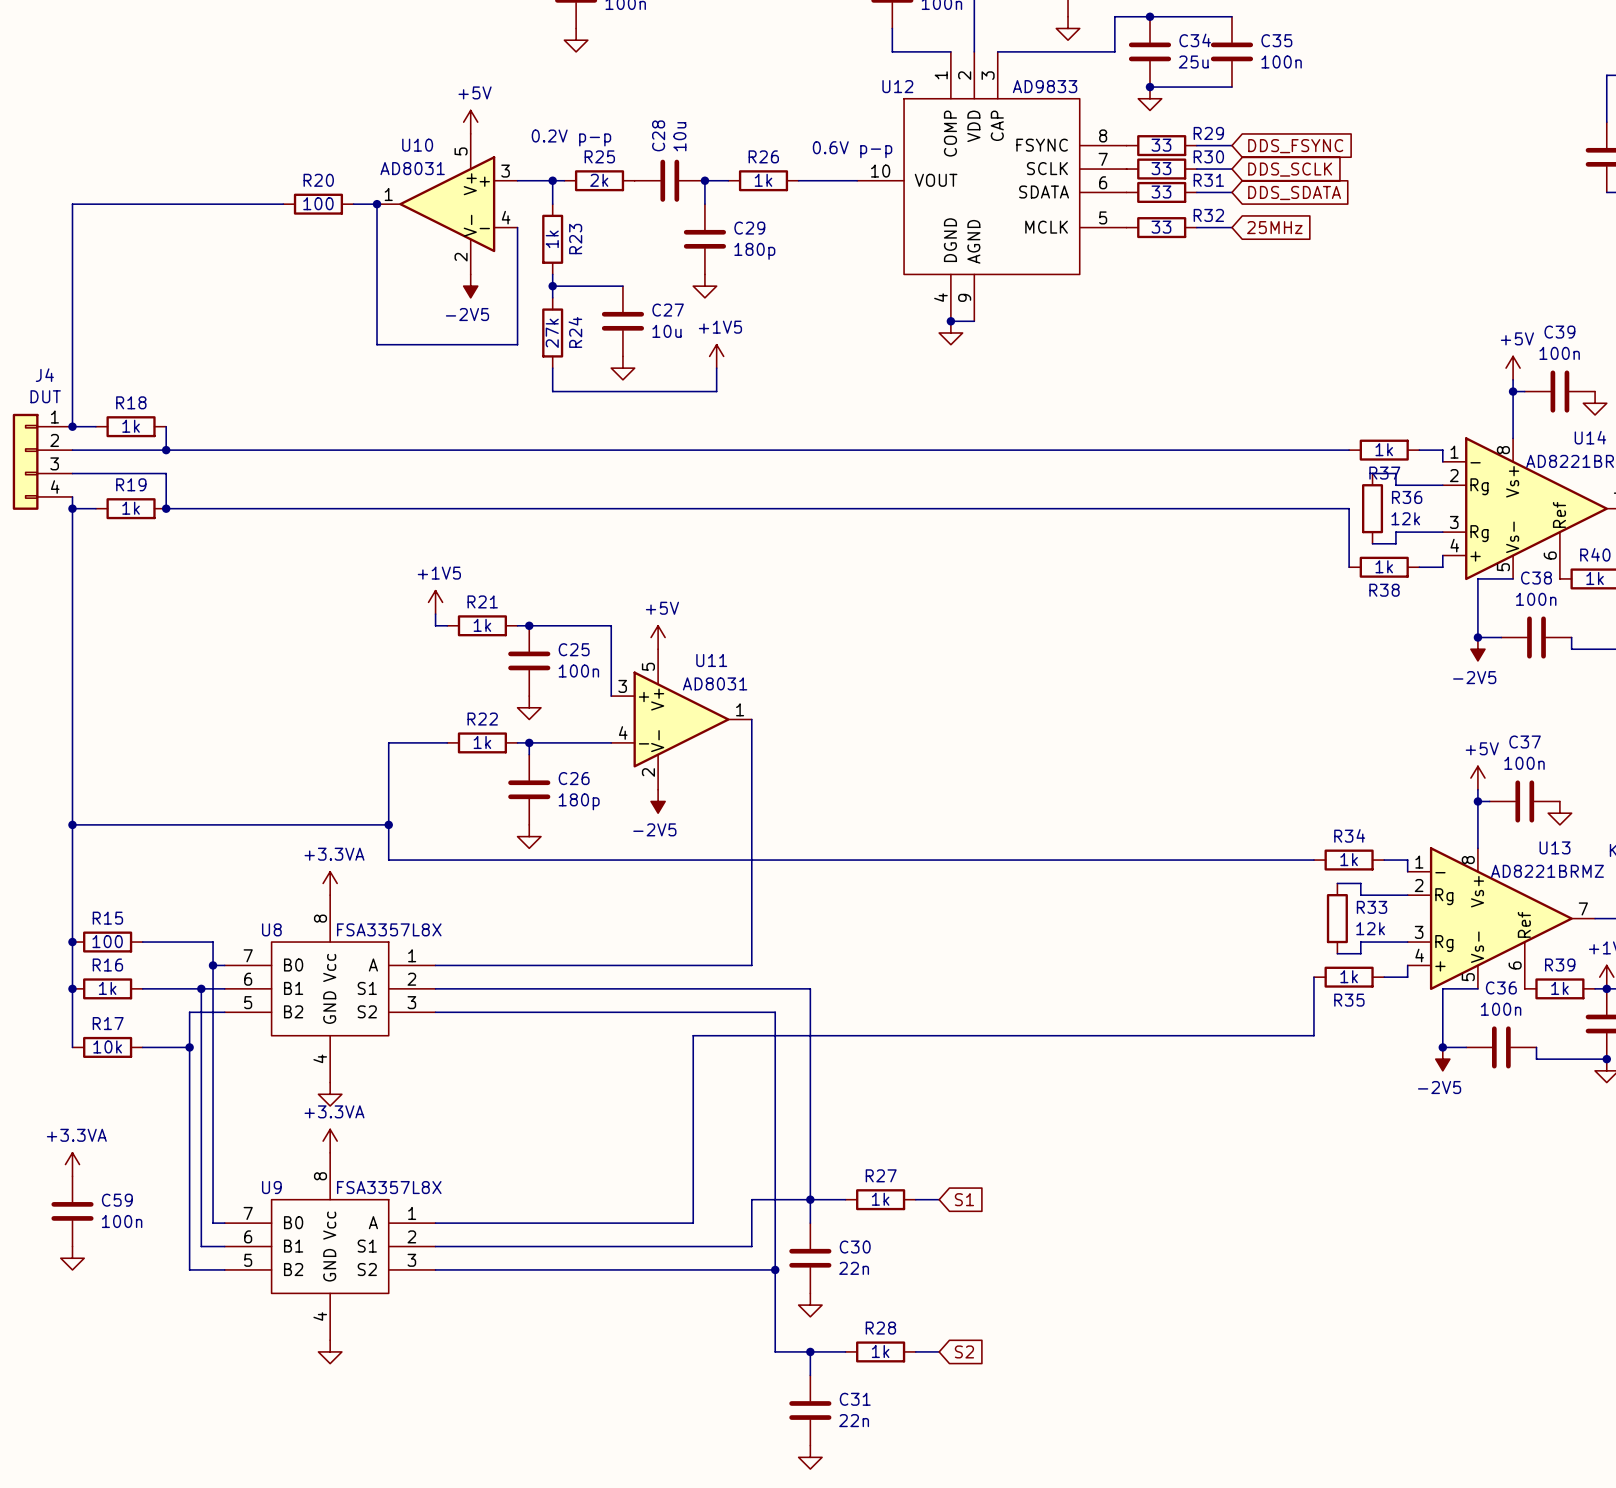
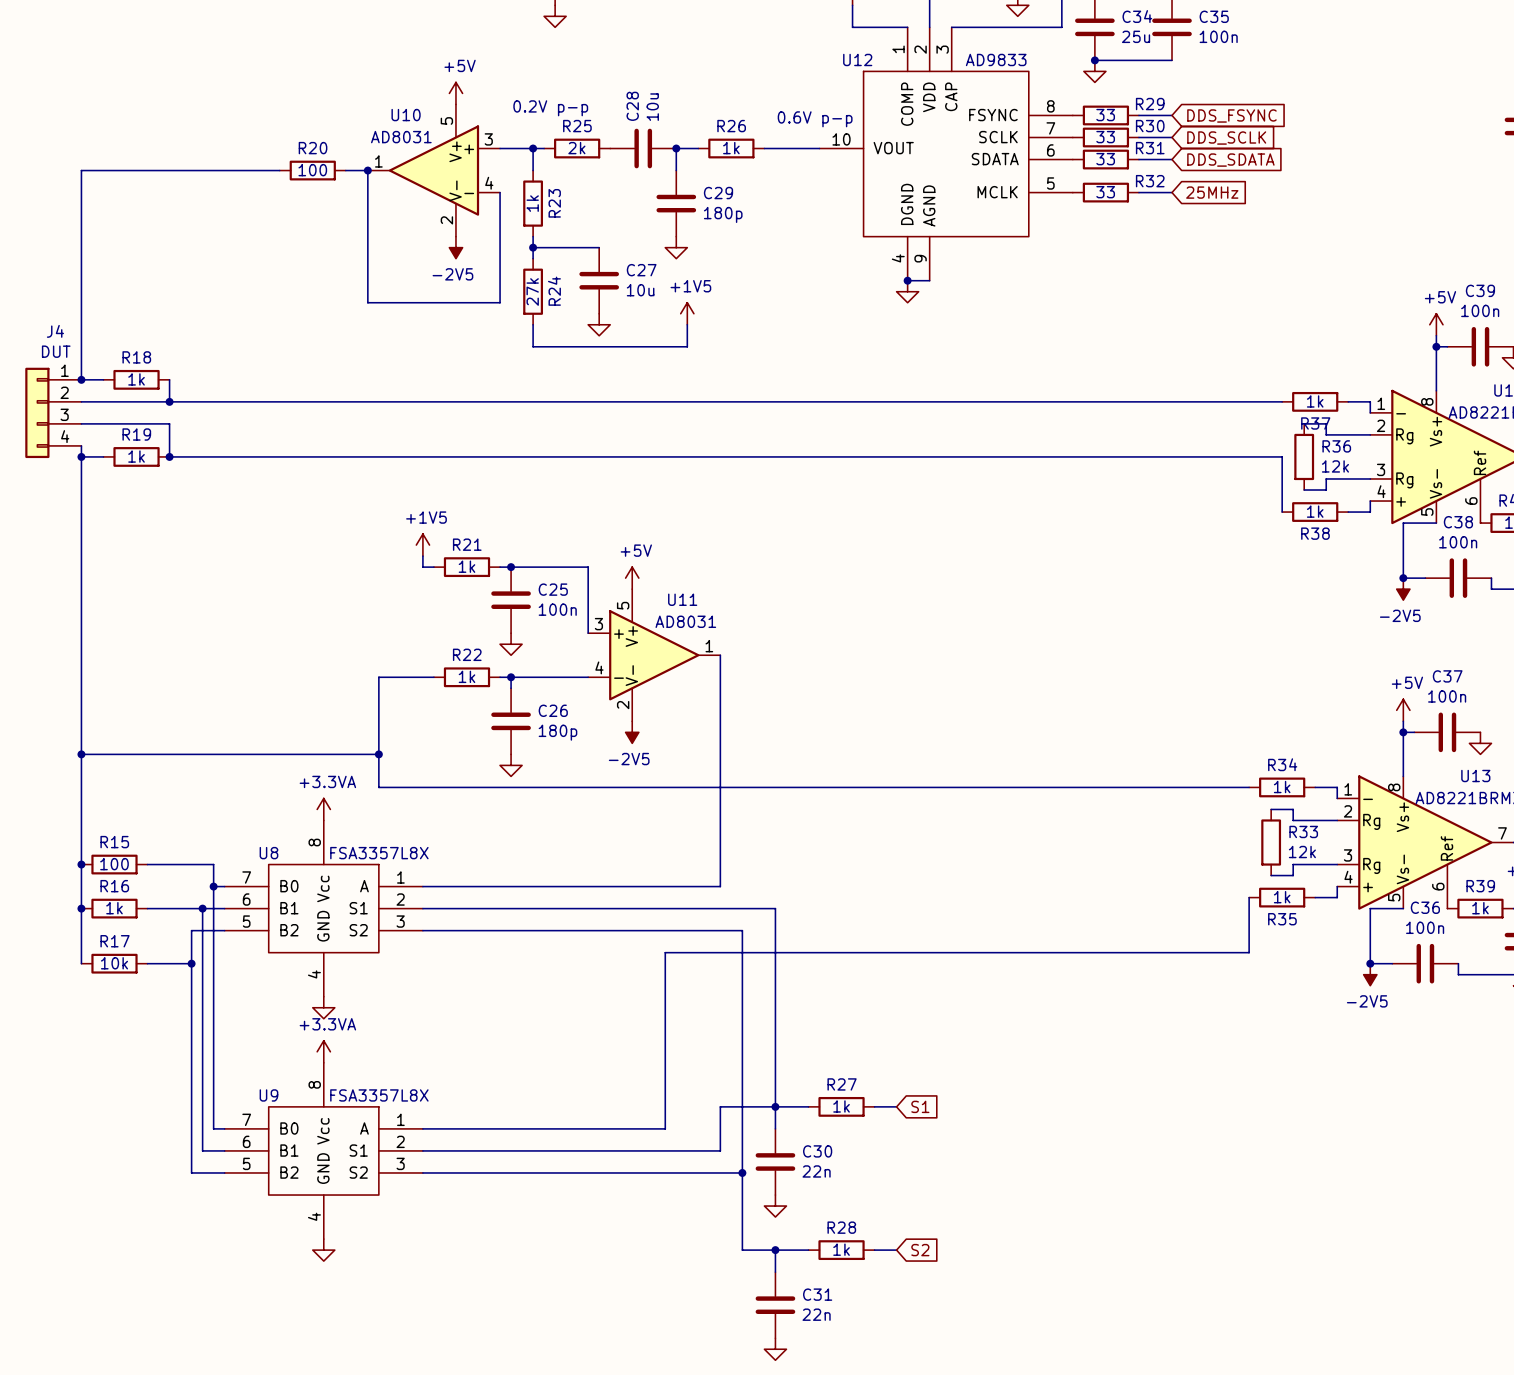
power symbol: +3.3VA (72, 1164) -> none
C59: 100n (72, 1211) -> none
power symbol: (72, 1258) -> none

